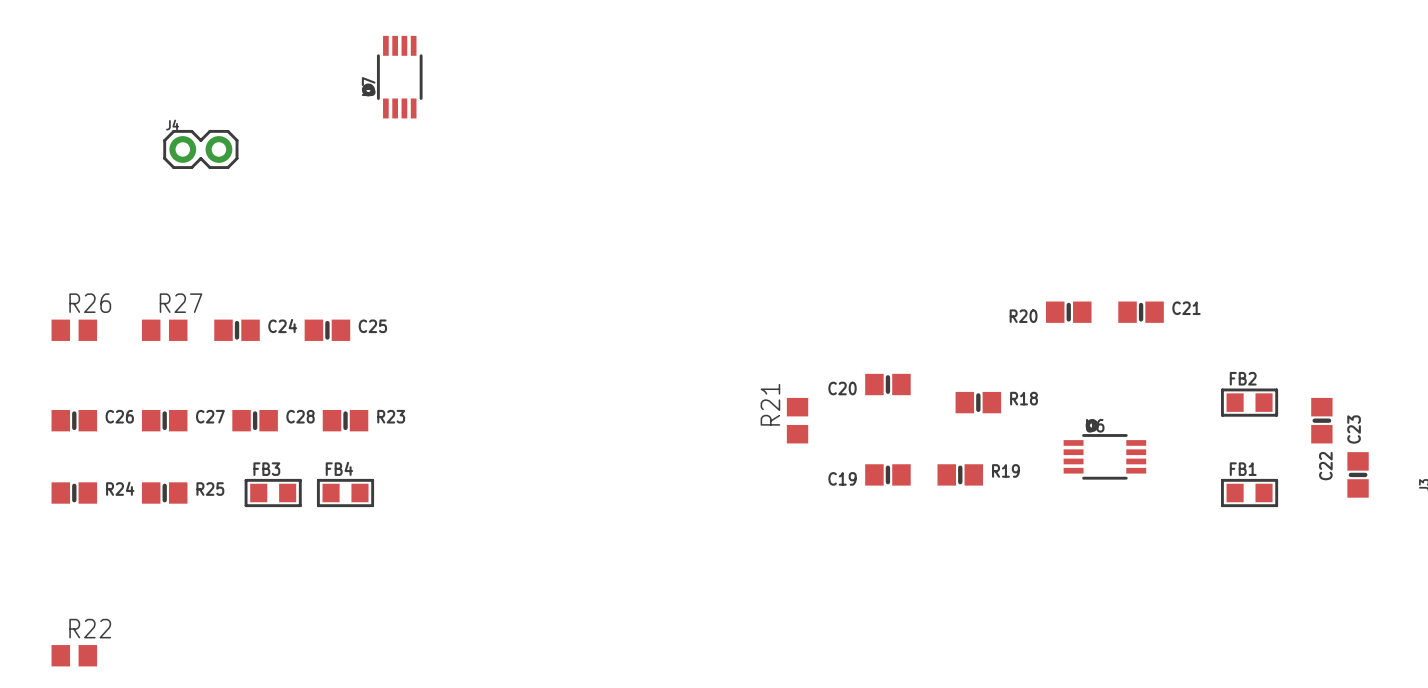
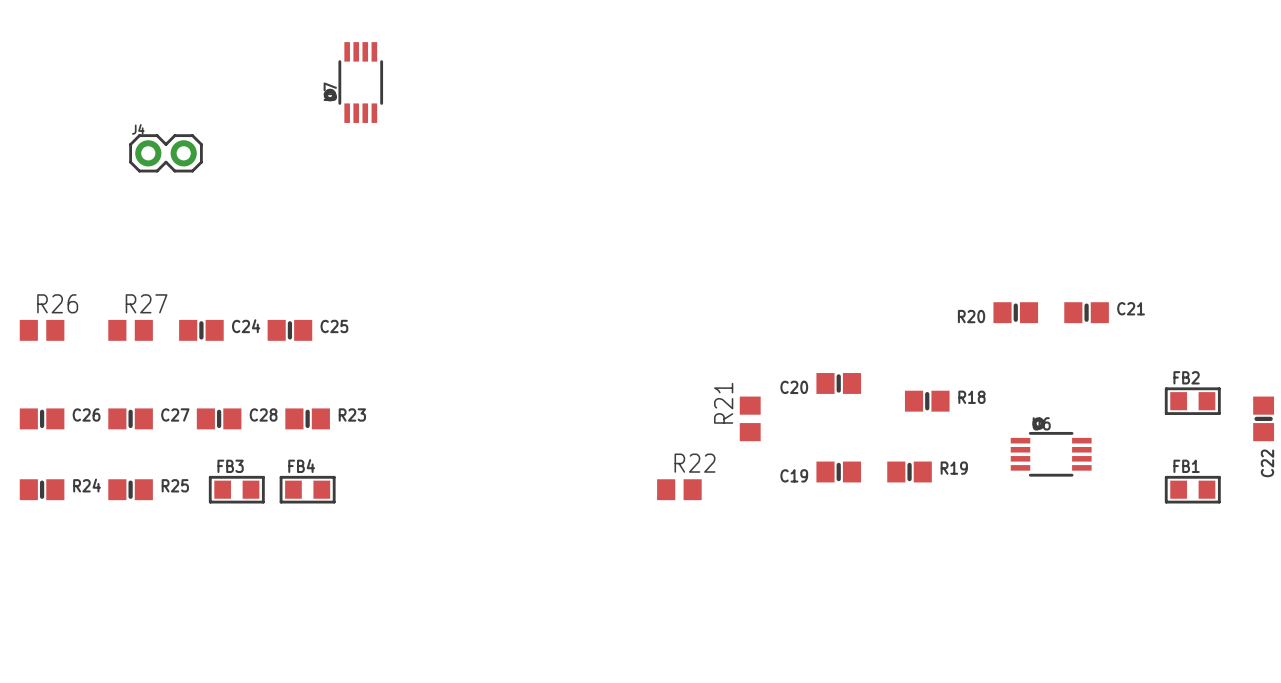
R22 position: (74, 655) -> (679, 489)

